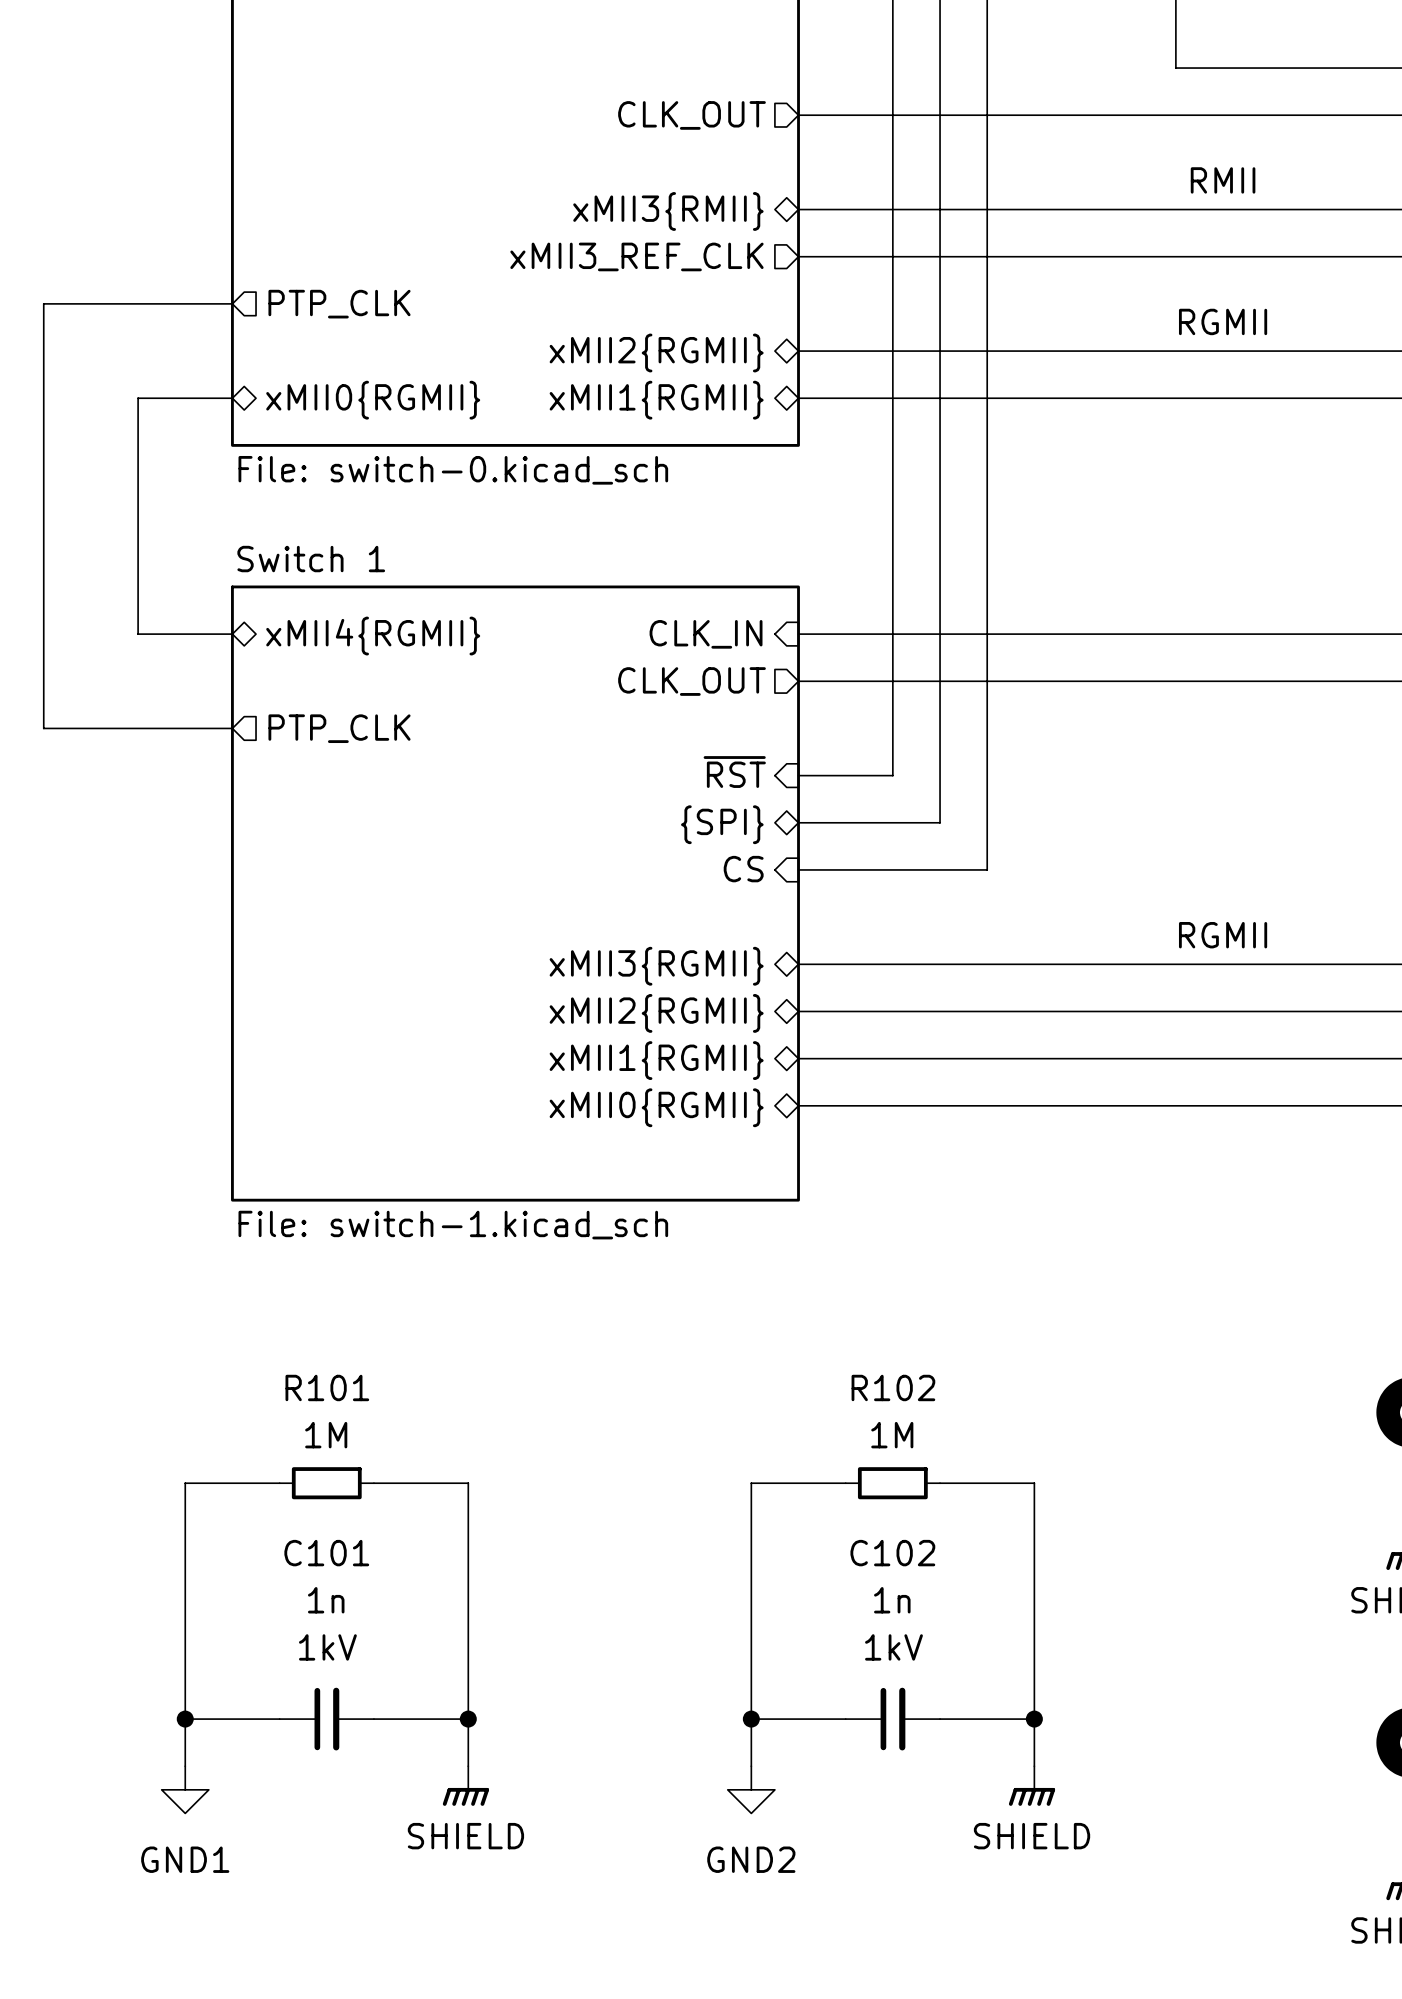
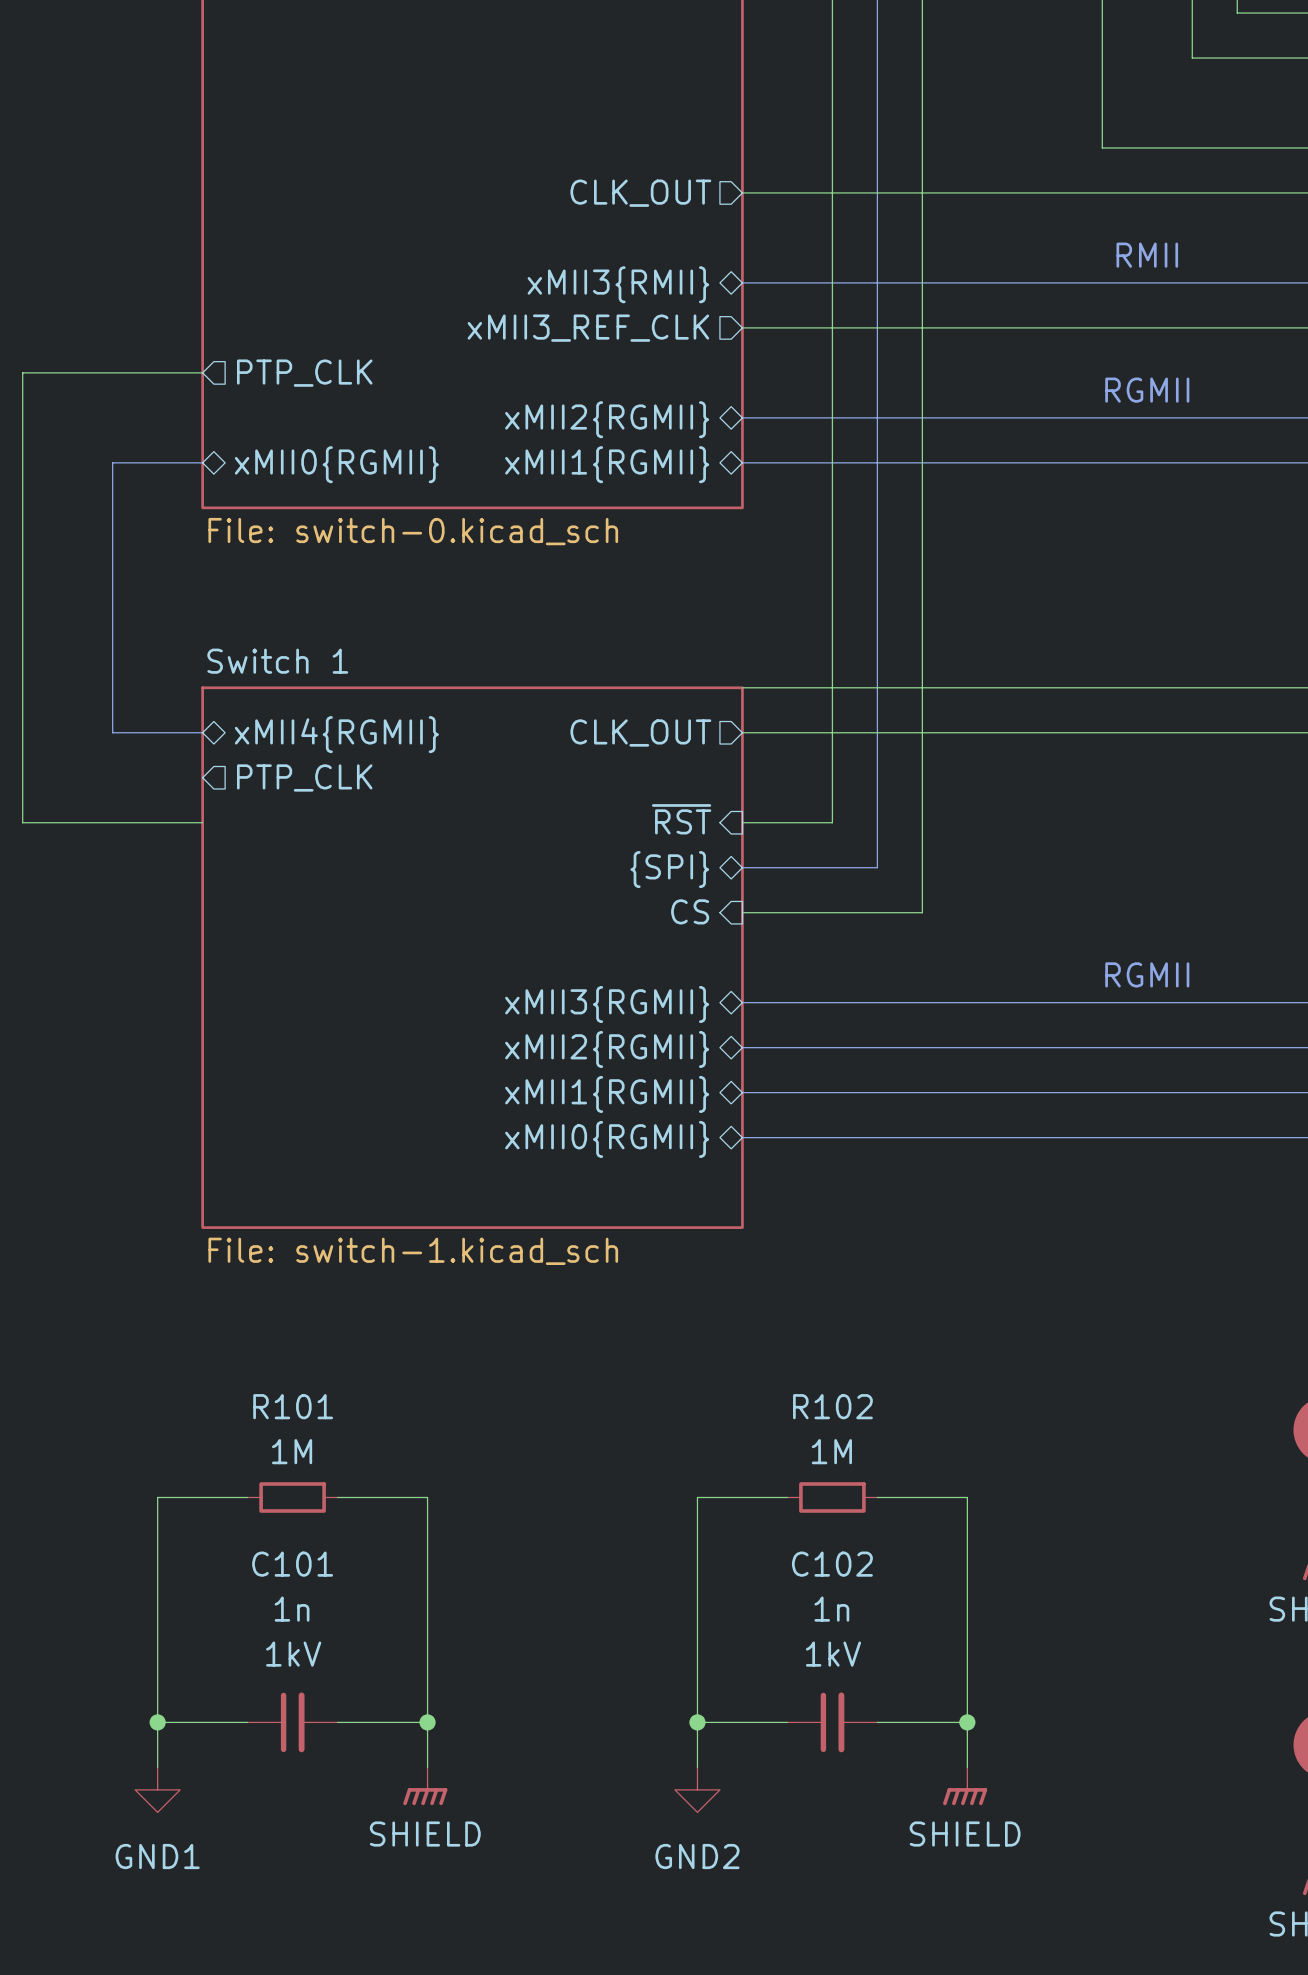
sheet Switch 1 shape: [231, 585, 800, 1202] -> [201, 686, 744, 1229]
bus: (138, 634) (232, 634) -> (112, 687) (112, 732) (202, 732)
sheet pin: CLK_IN (706, 634) -> none
sheet pin position: xMII4{RGMII} (373, 636) -> xMII4{RGMII} (336, 734)
wire: (43, 728) (232, 728) -> (22, 777) (22, 822) (202, 822)

